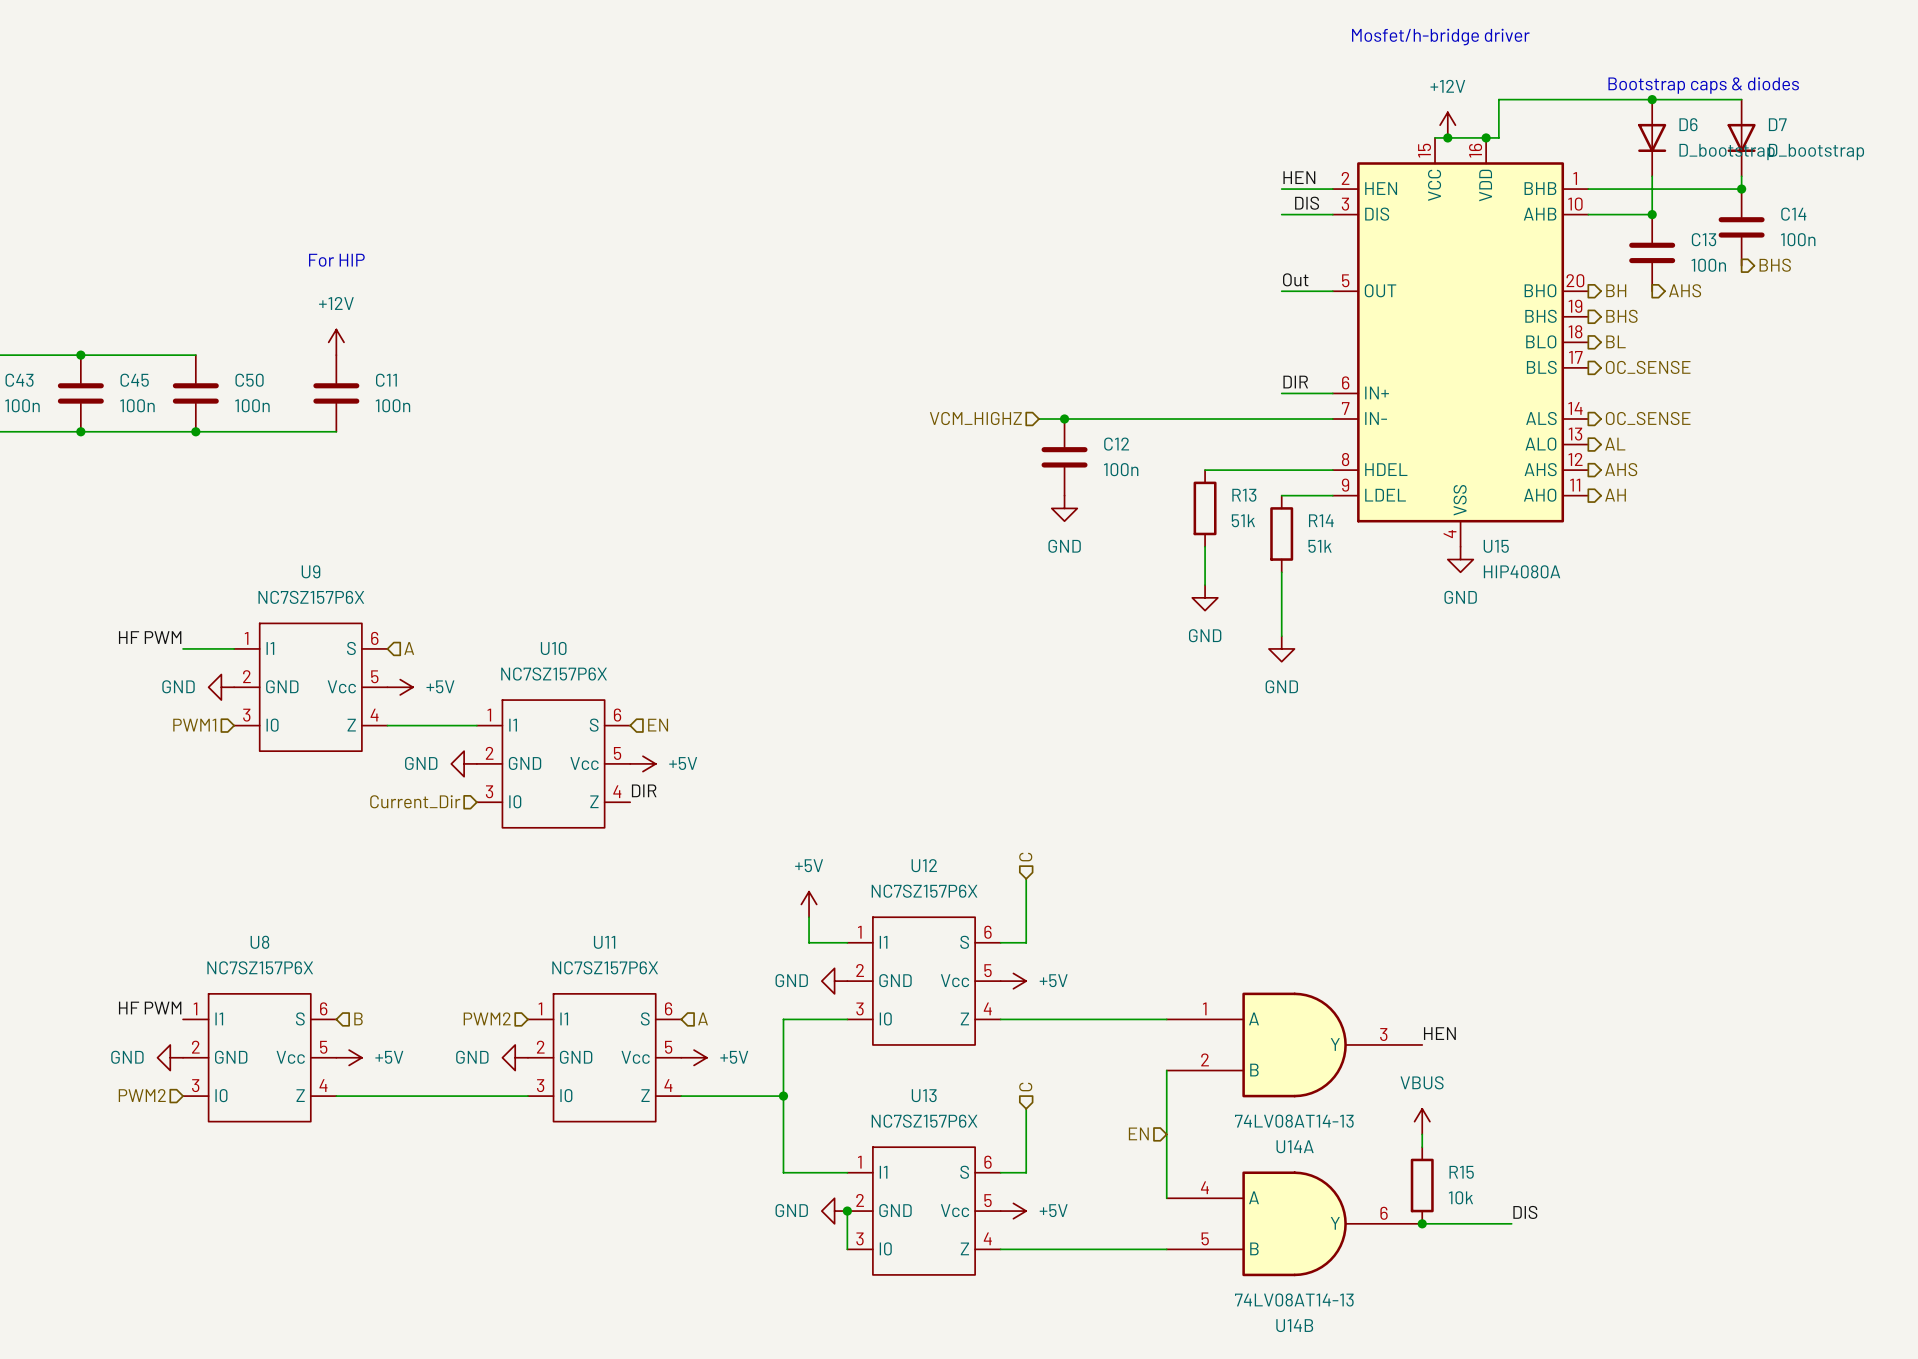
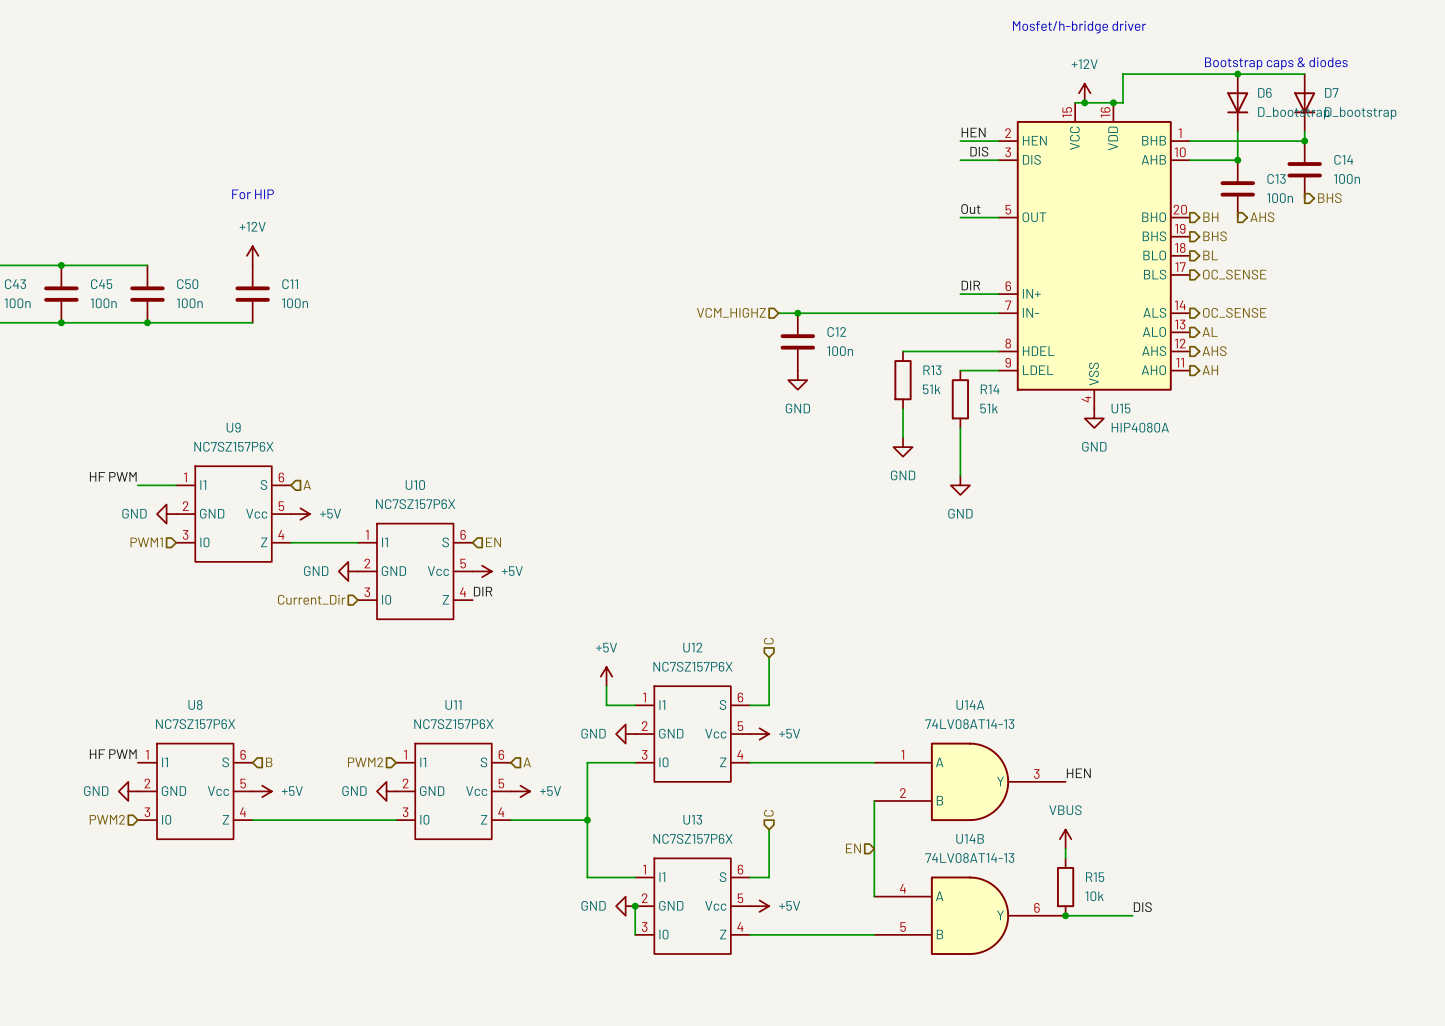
U14A value position: 74LV08AT14-13 (1294, 1121) -> 74LV08AT14-13 (969, 724)
U14A name position: U14A (1295, 1146) -> U14A (970, 705)
U14B value position: 74LV08AT14-13 (1294, 1300) -> 74LV08AT14-13 (969, 858)
U14B name position: U14B (1294, 1325) -> U14B (970, 838)

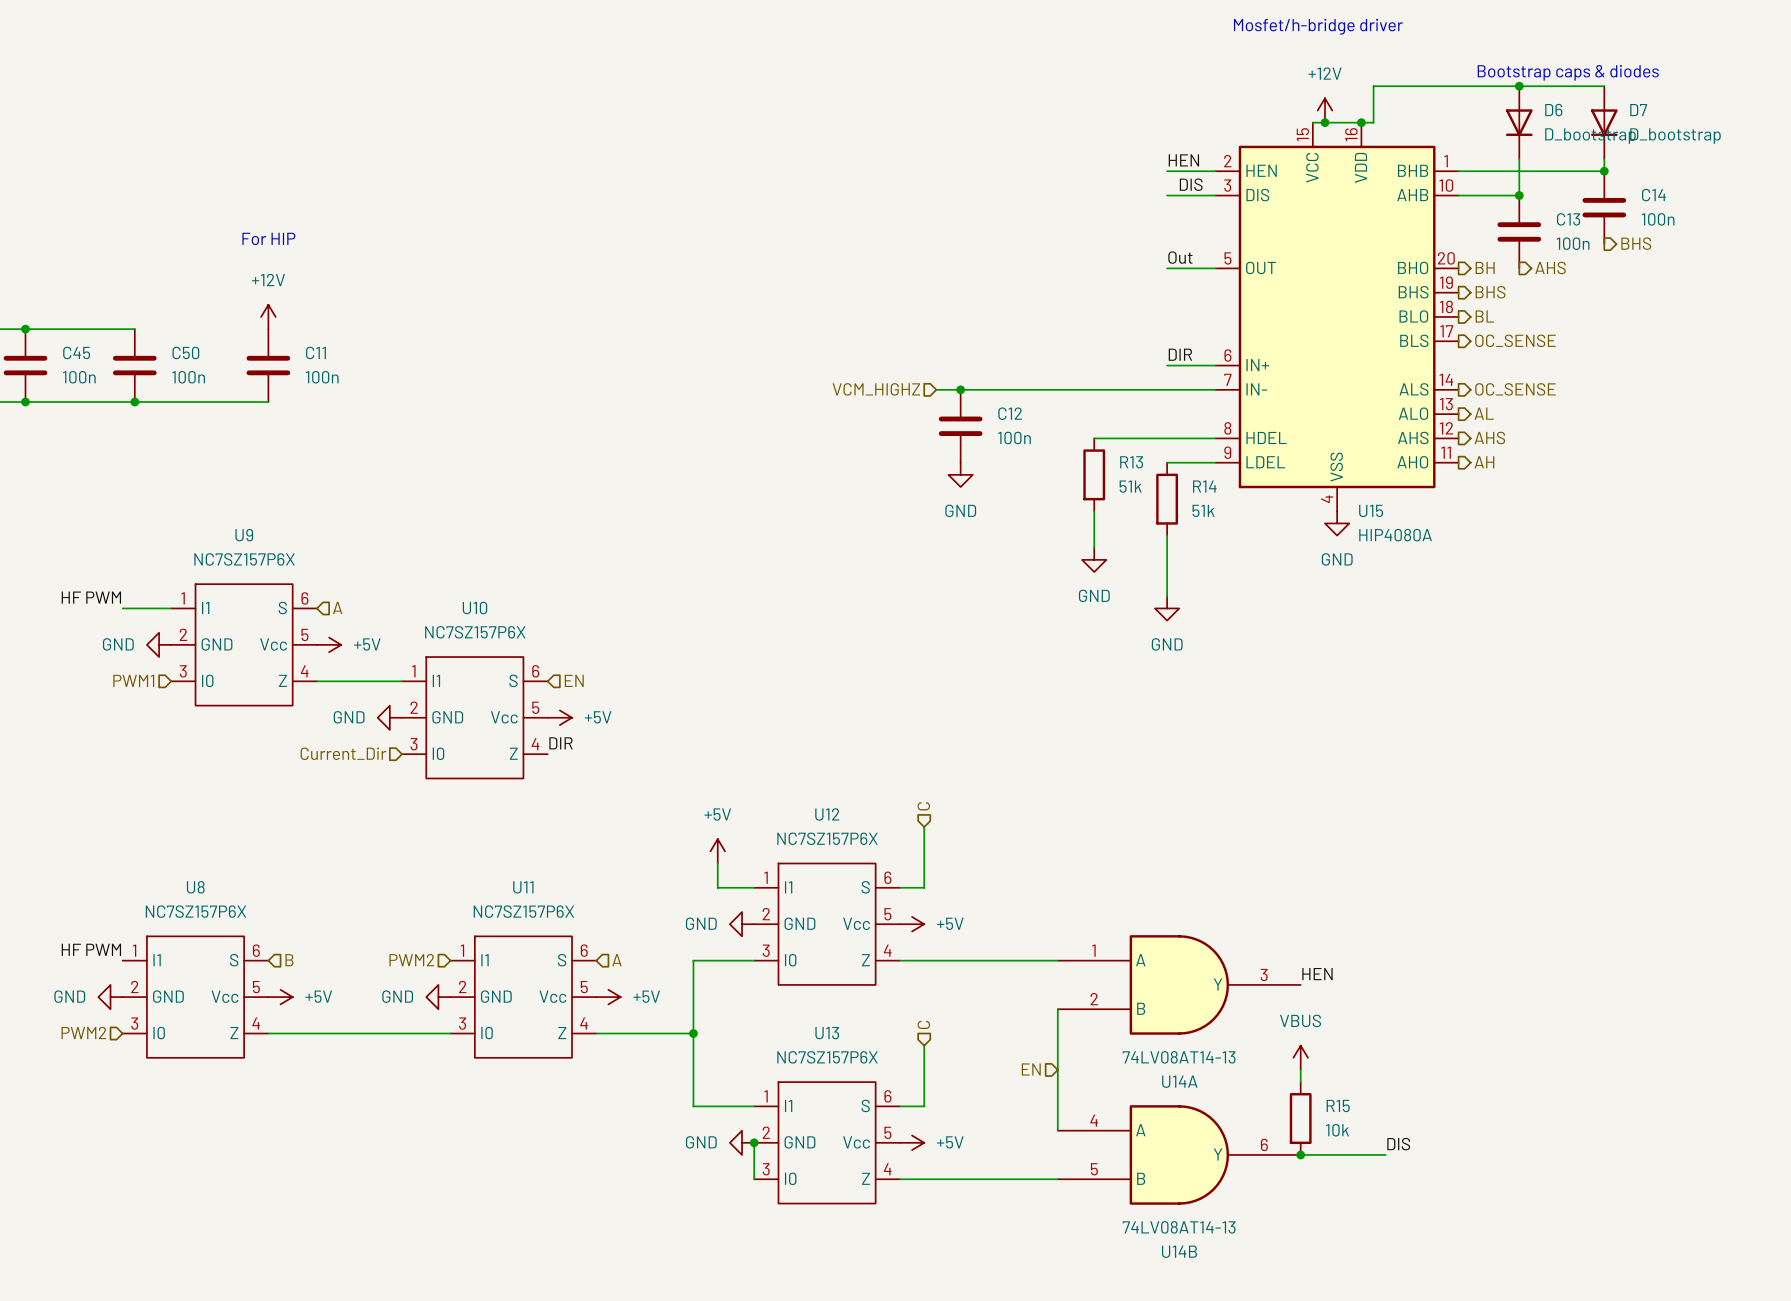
U14A name position: U14A (970, 705) -> U14A (1179, 1081)
U14A value position: 74LV08AT14-13 (969, 724) -> 74LV08AT14-13 (1179, 1057)
U14B name position: U14B (970, 838) -> U14B (1179, 1251)
U14B value position: 74LV08AT14-13 (969, 858) -> 74LV08AT14-13 (1179, 1227)

